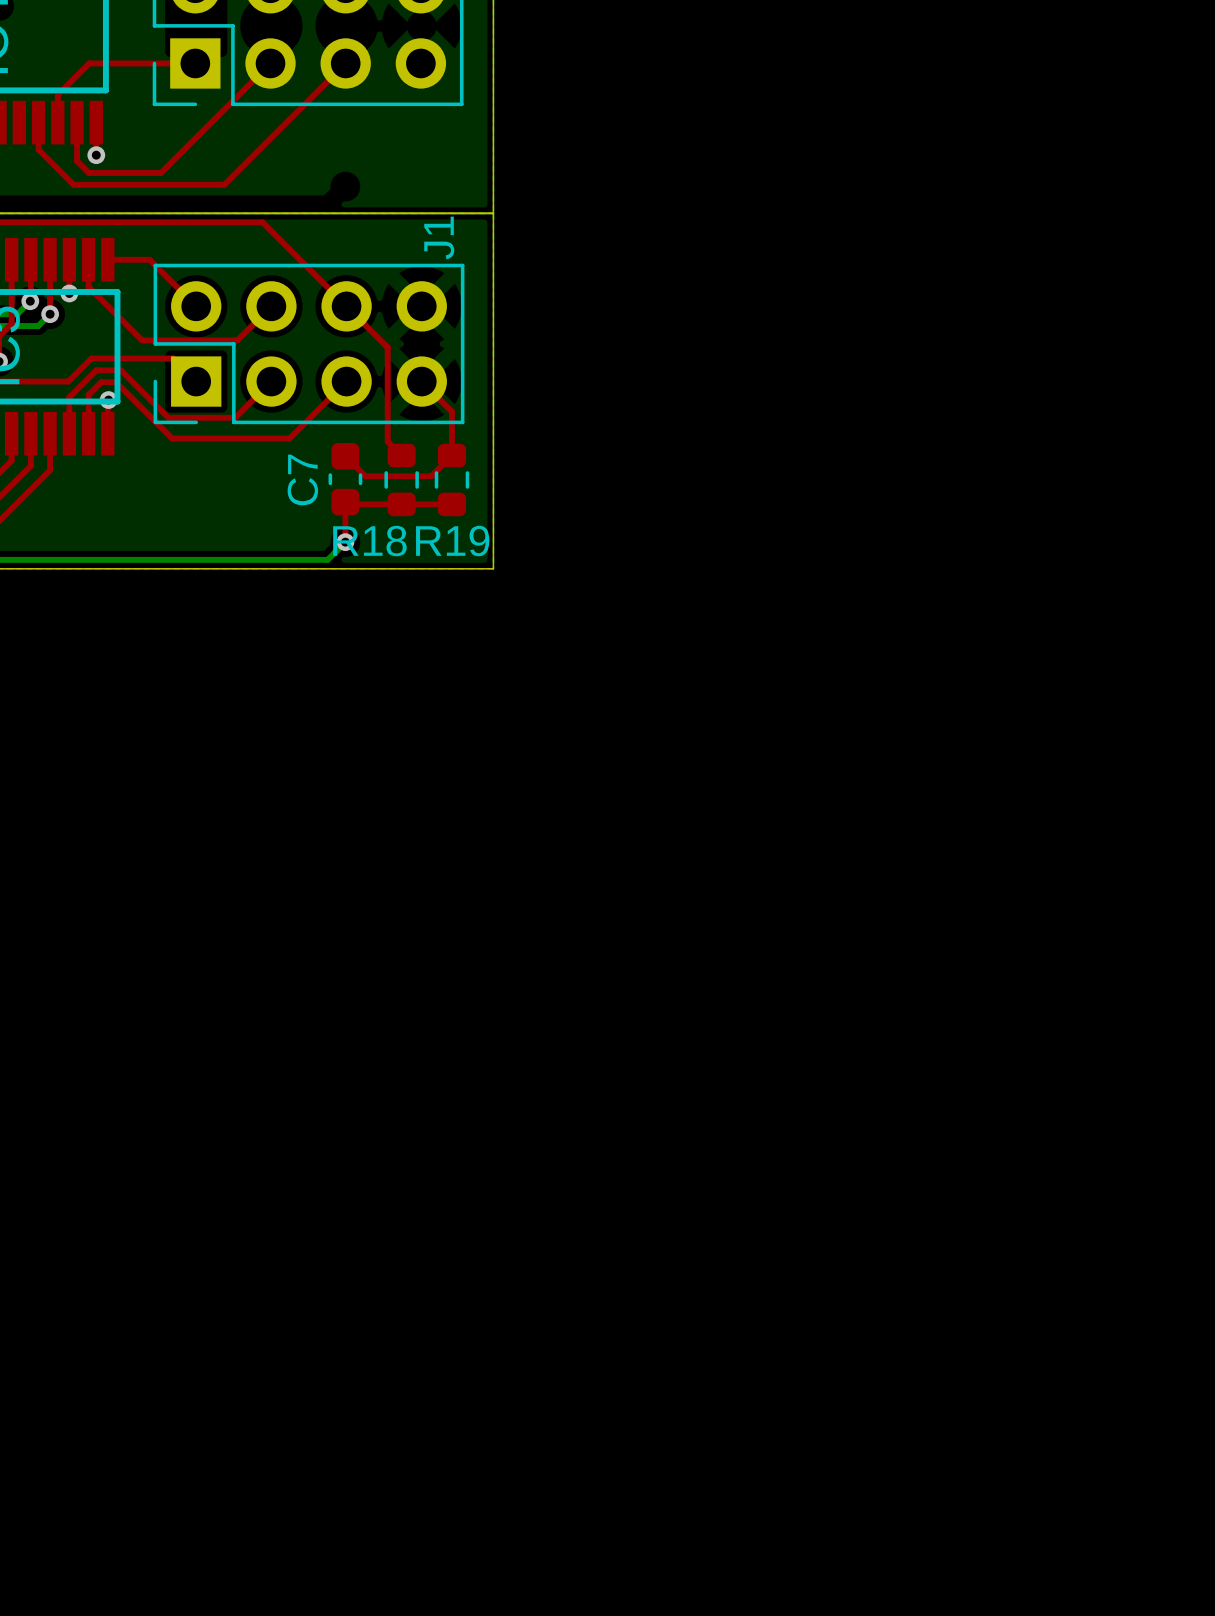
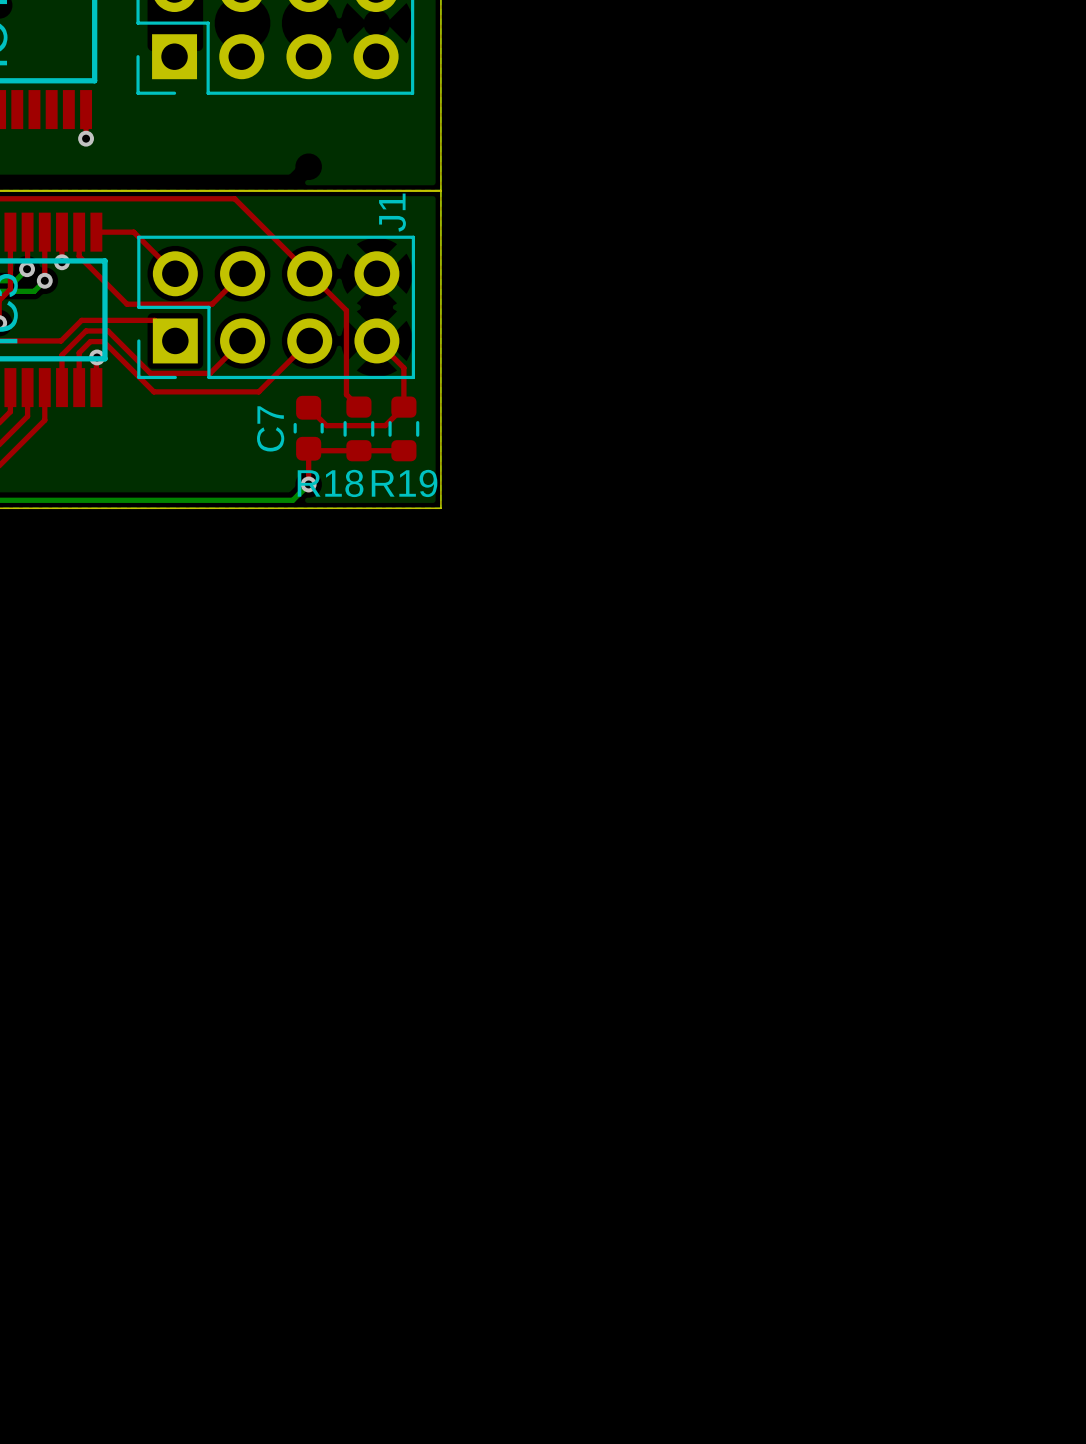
top track: (195, 63) (89, 63) (57, 94) (57, 122) -> none
top track: (270, 63) (161, 172) (88, 172) (77, 161) (77, 122) -> none
top track: (345, 63) (224, 184) (73, 184) (38, 149) (38, 122) -> none

